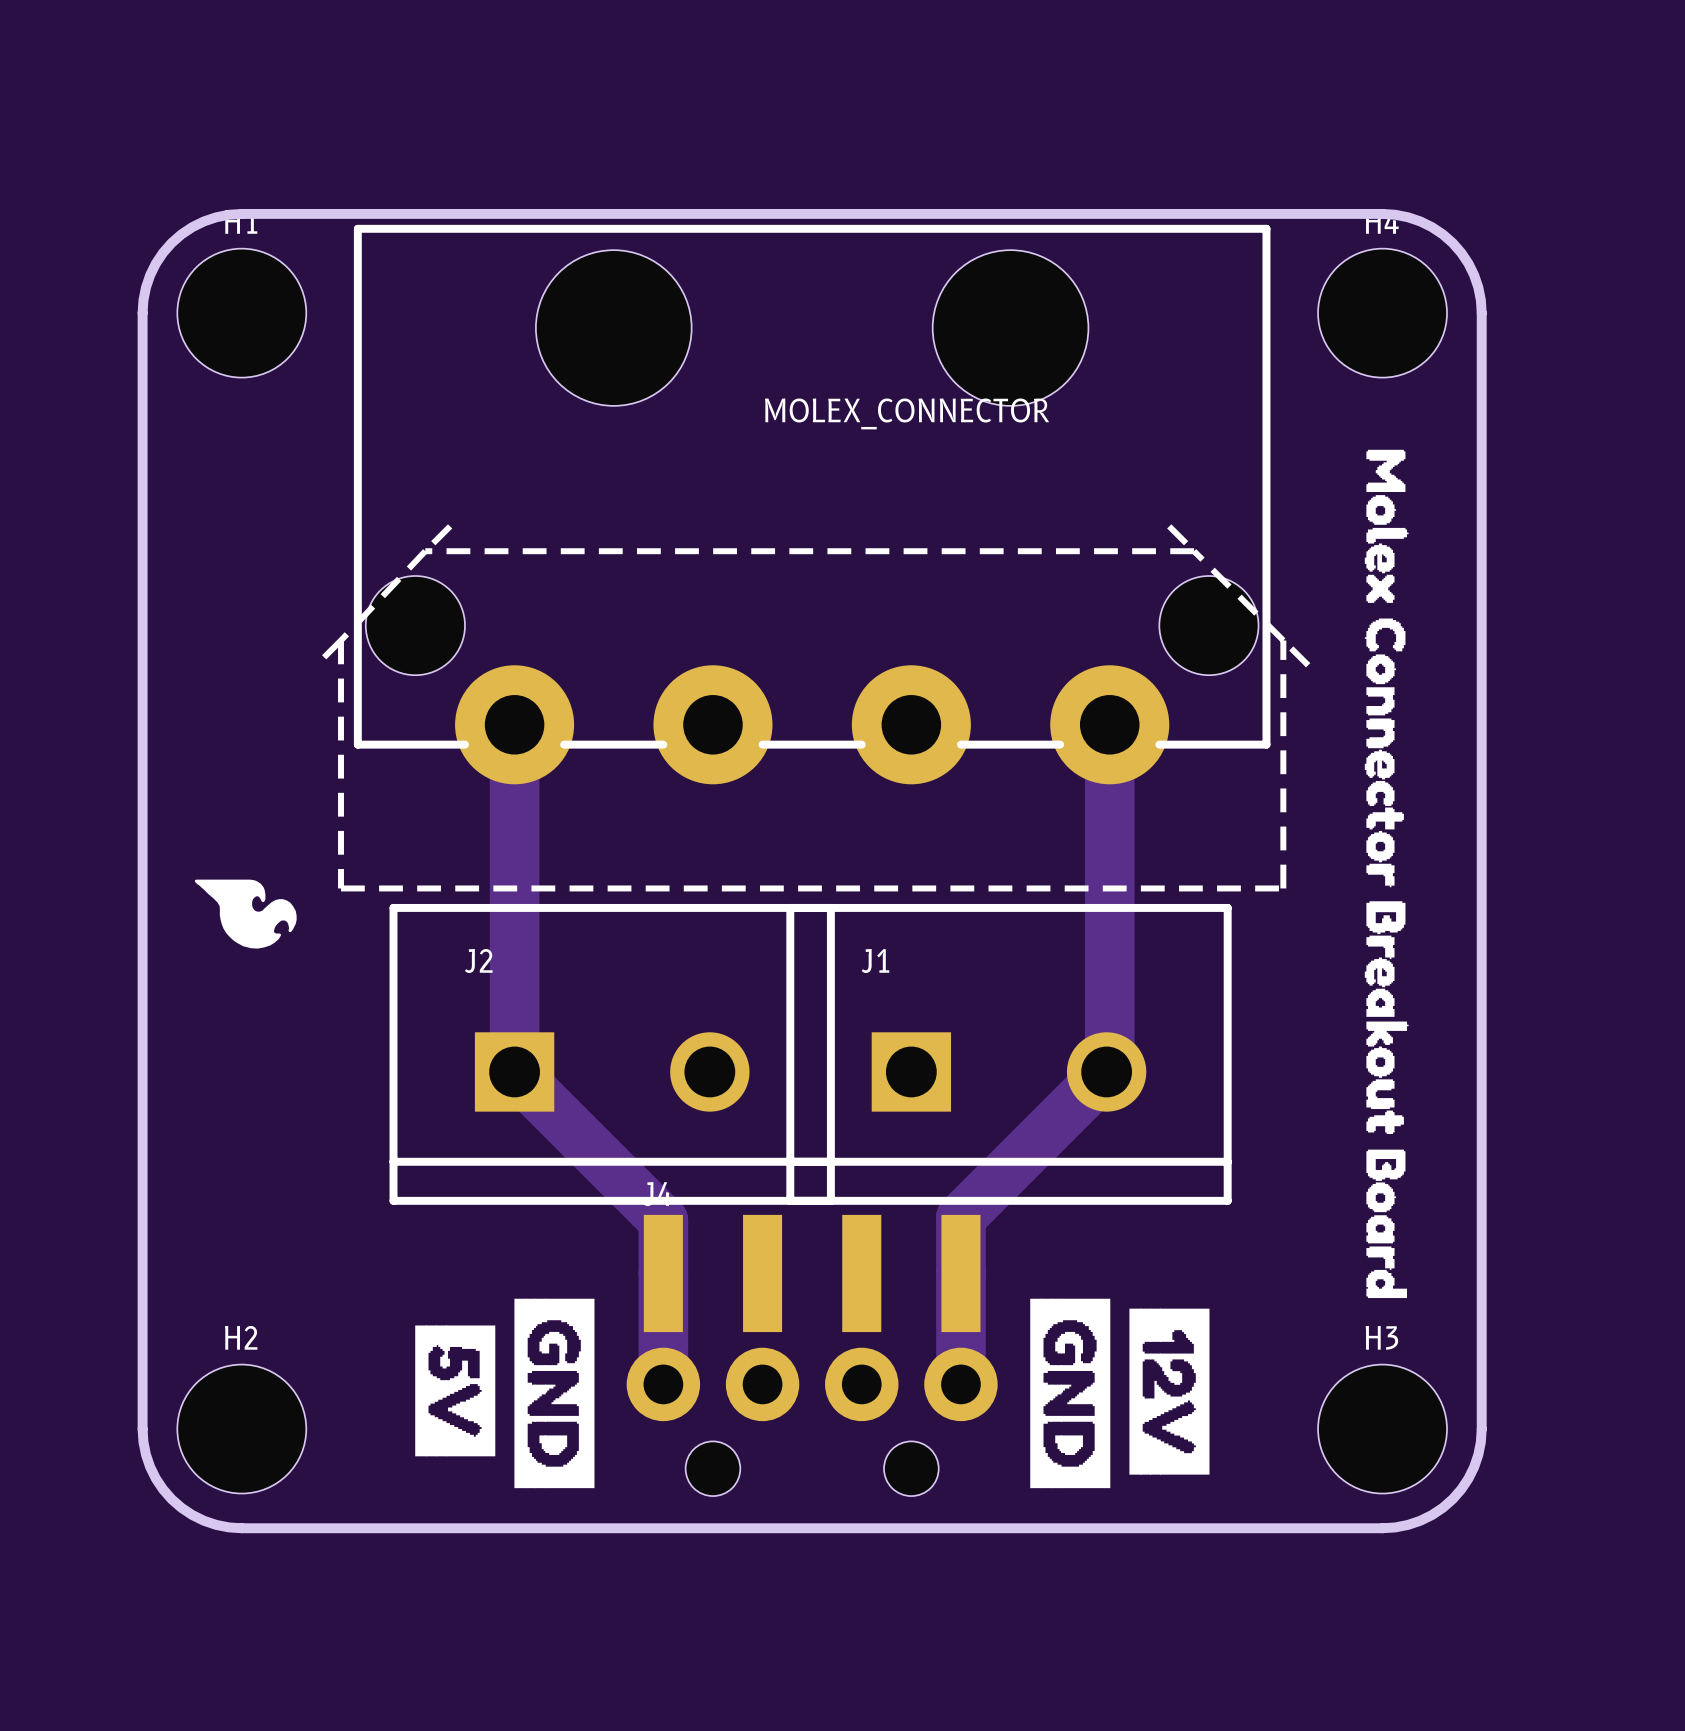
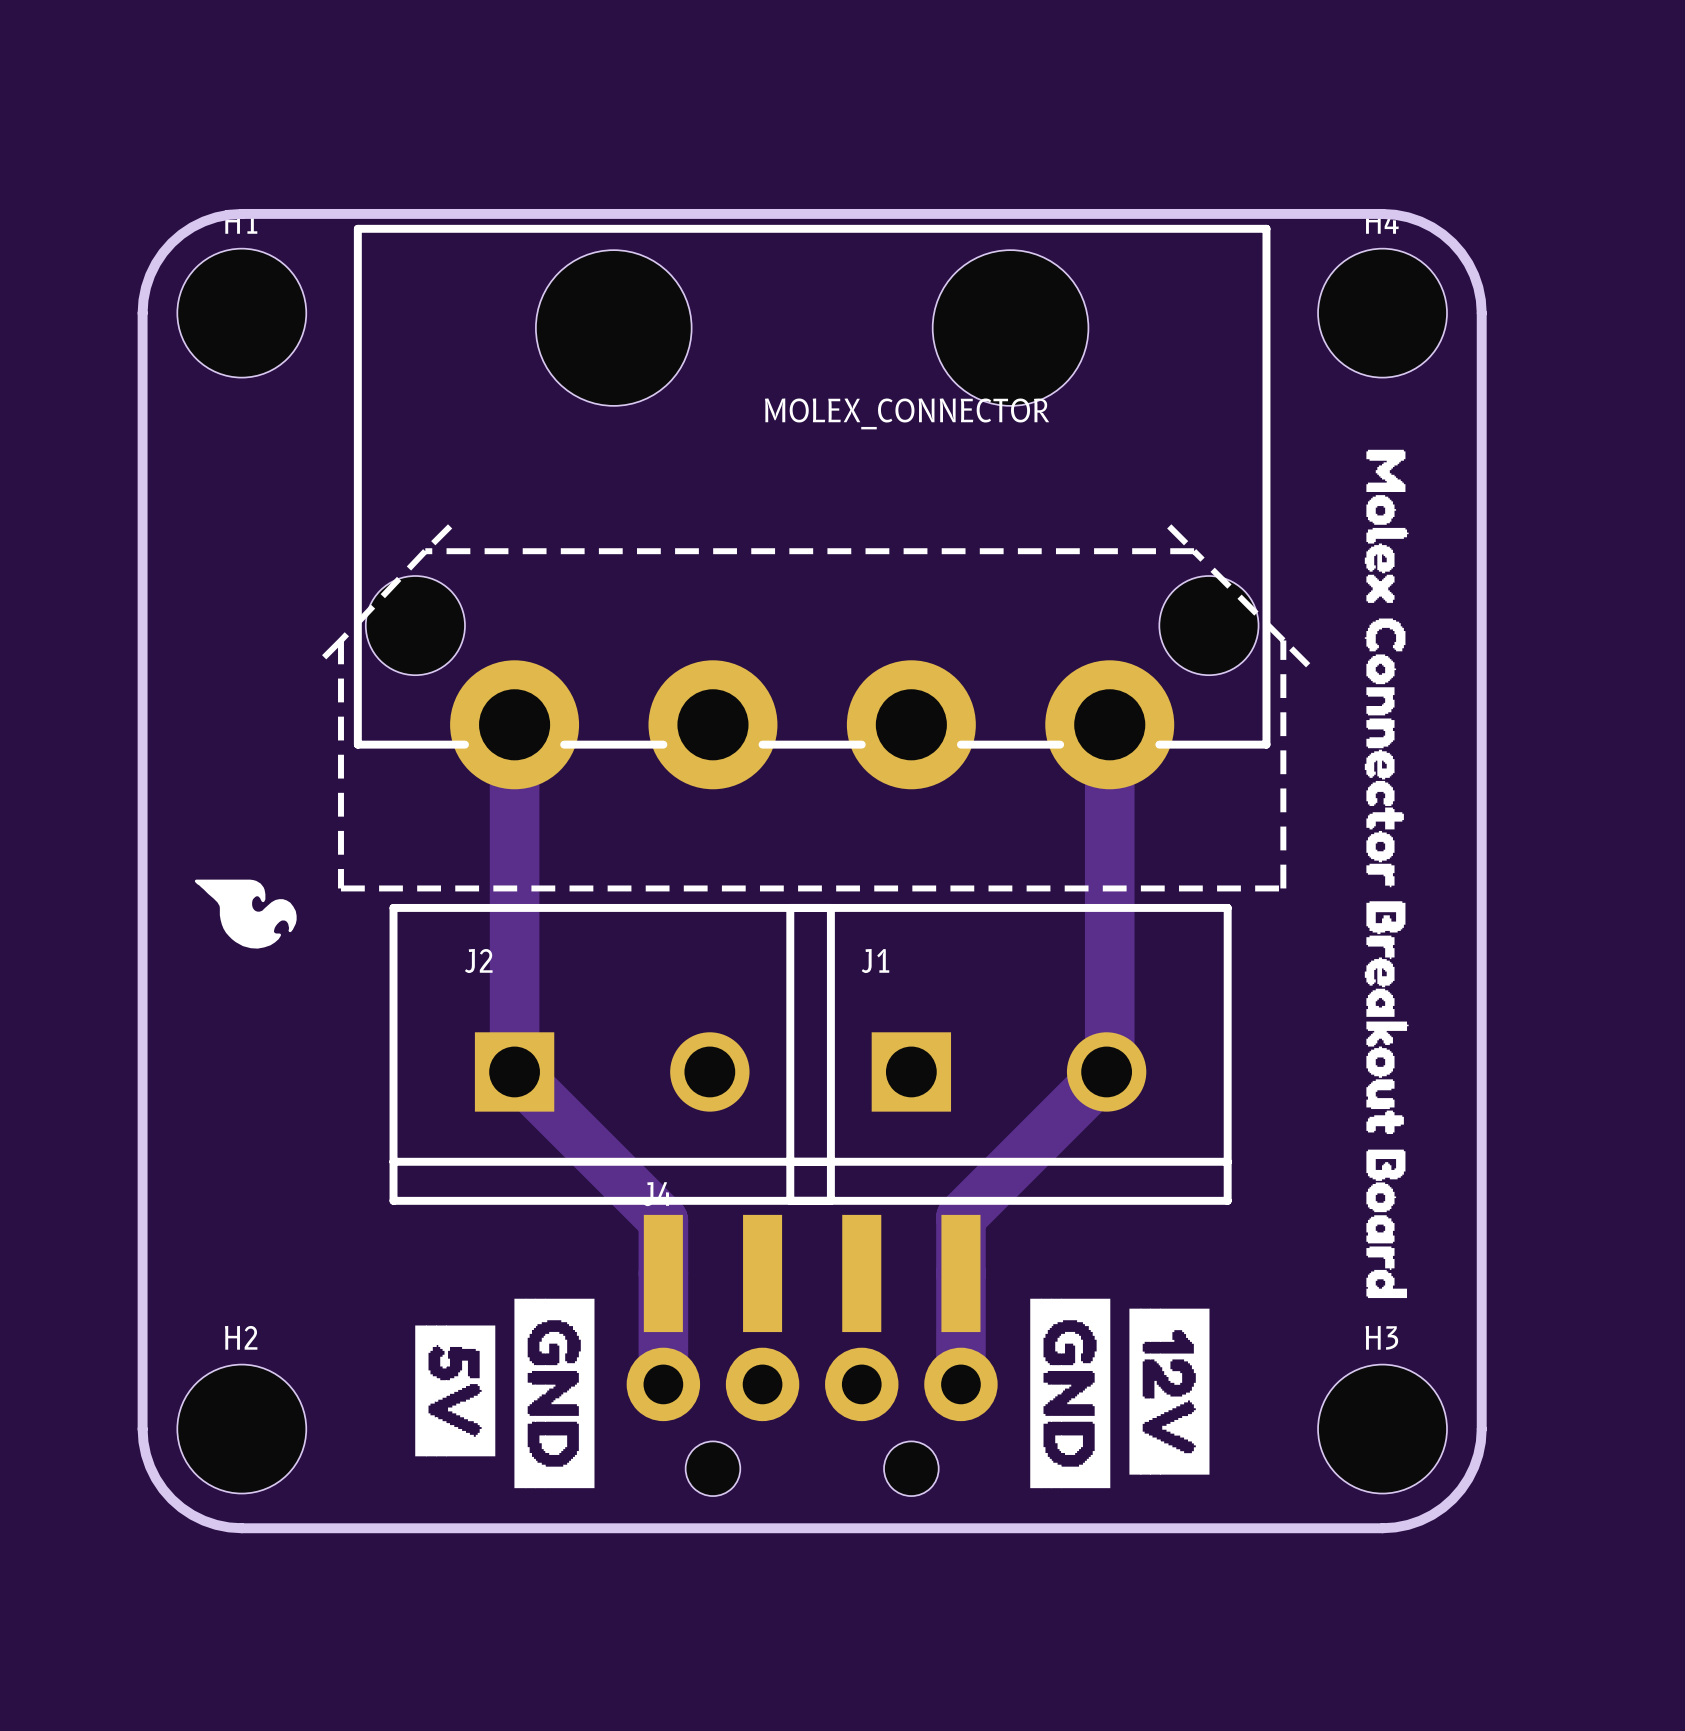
MOLEX_CONNECTOR: (812, 504) -> none
MOLEX_CONNECTOR: none -> (812, 558)

